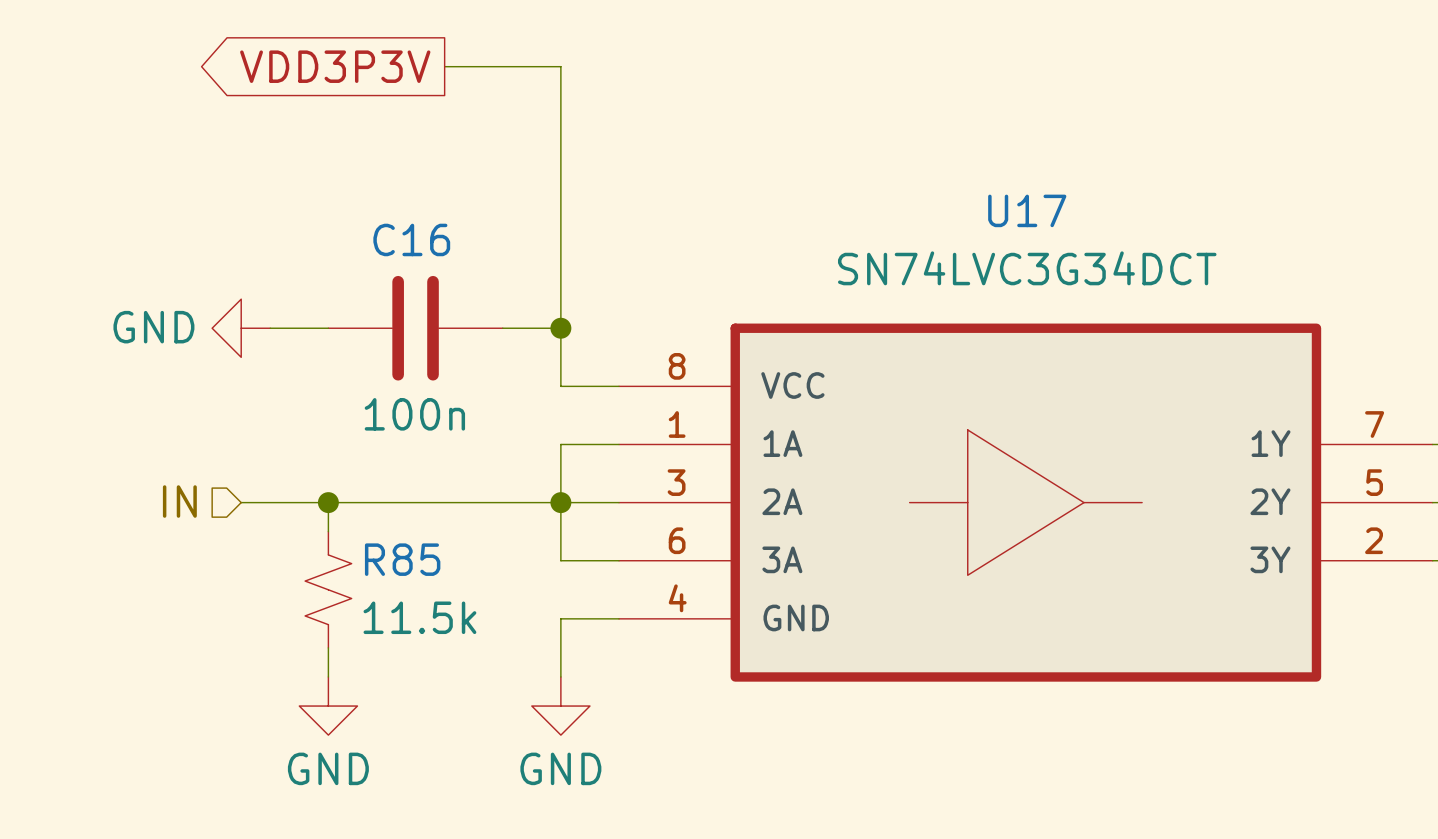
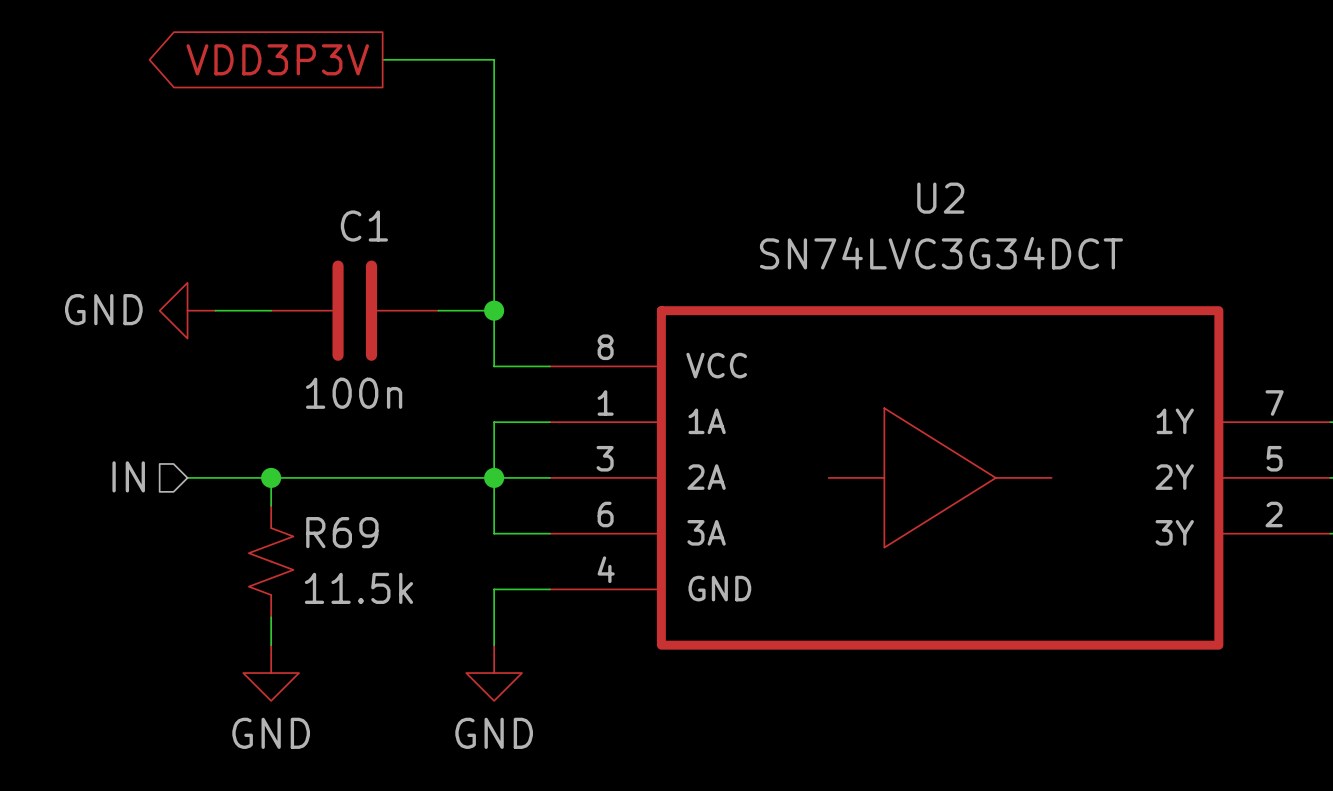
U17 name: U17 (1027, 210) -> U2 (940, 198)
C16 name: C16 (411, 239) -> C1 (364, 226)
R85 name: R85 (402, 559) -> R69 (342, 532)

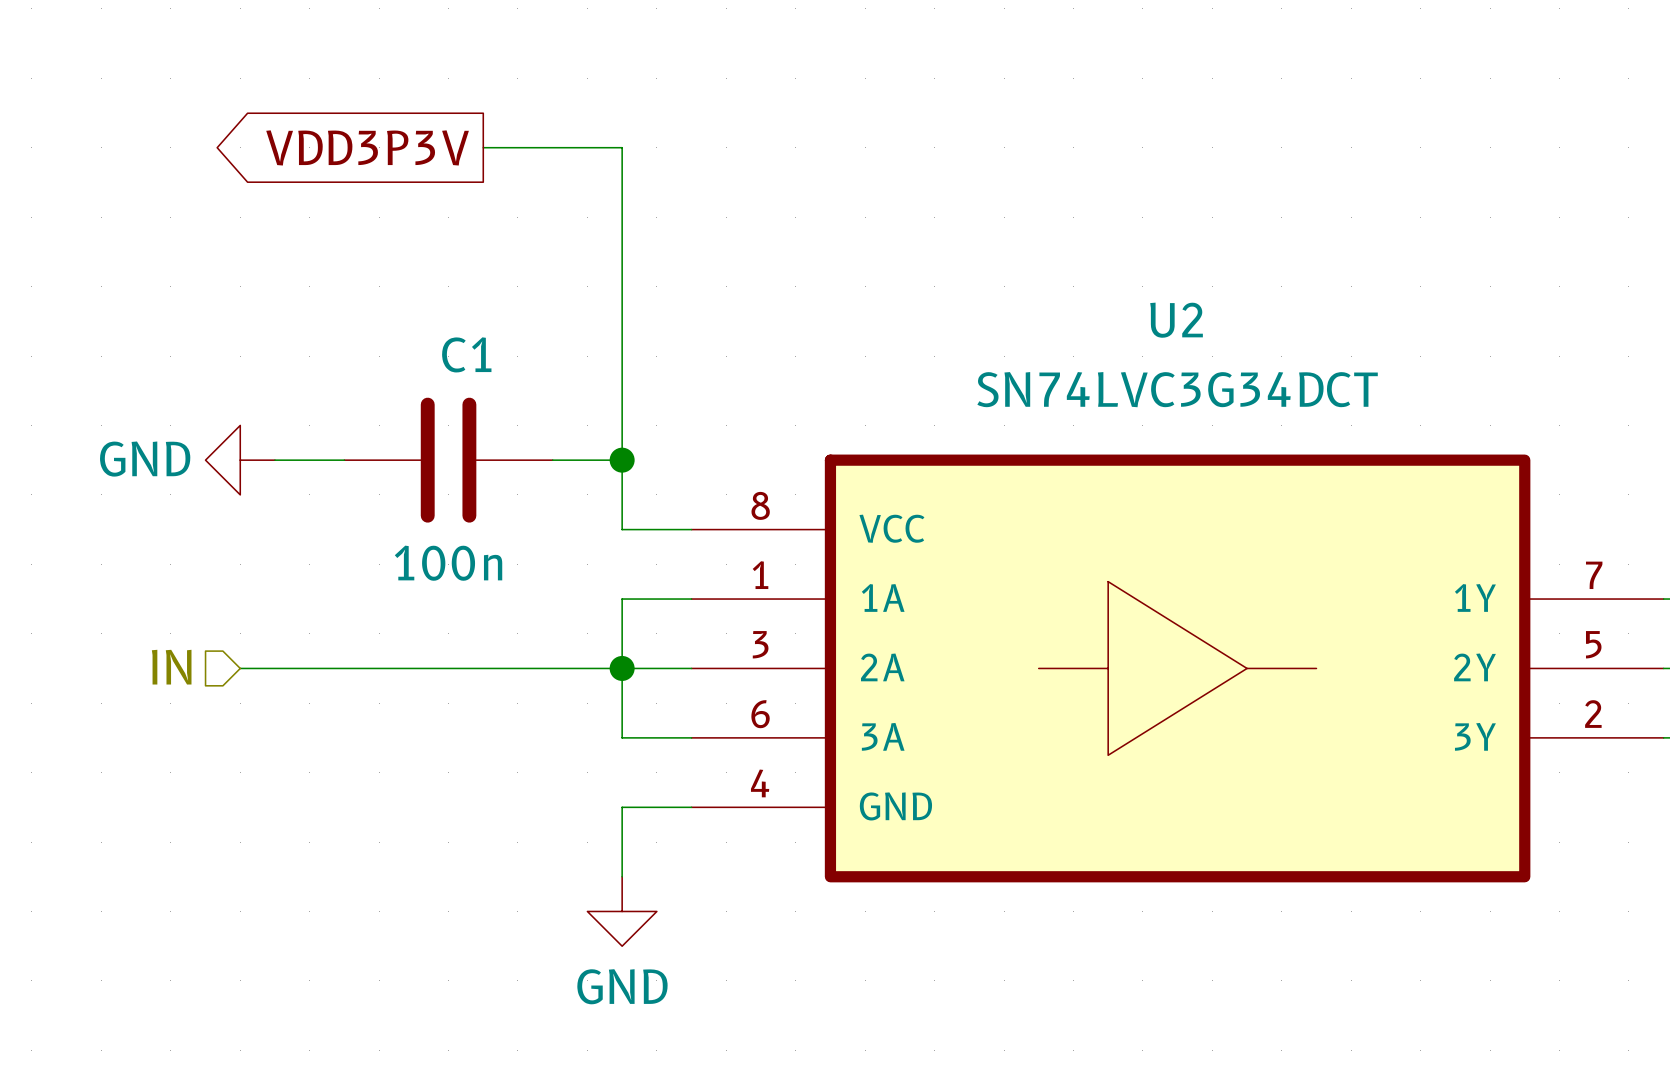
wire: (271, 477) (271, 505) -> none
junction: (271, 477) -> none
R69: 11.5k (271, 561) -> none
wire: (271, 617) (271, 645) -> none
power symbol: GND (271, 673) -> none

